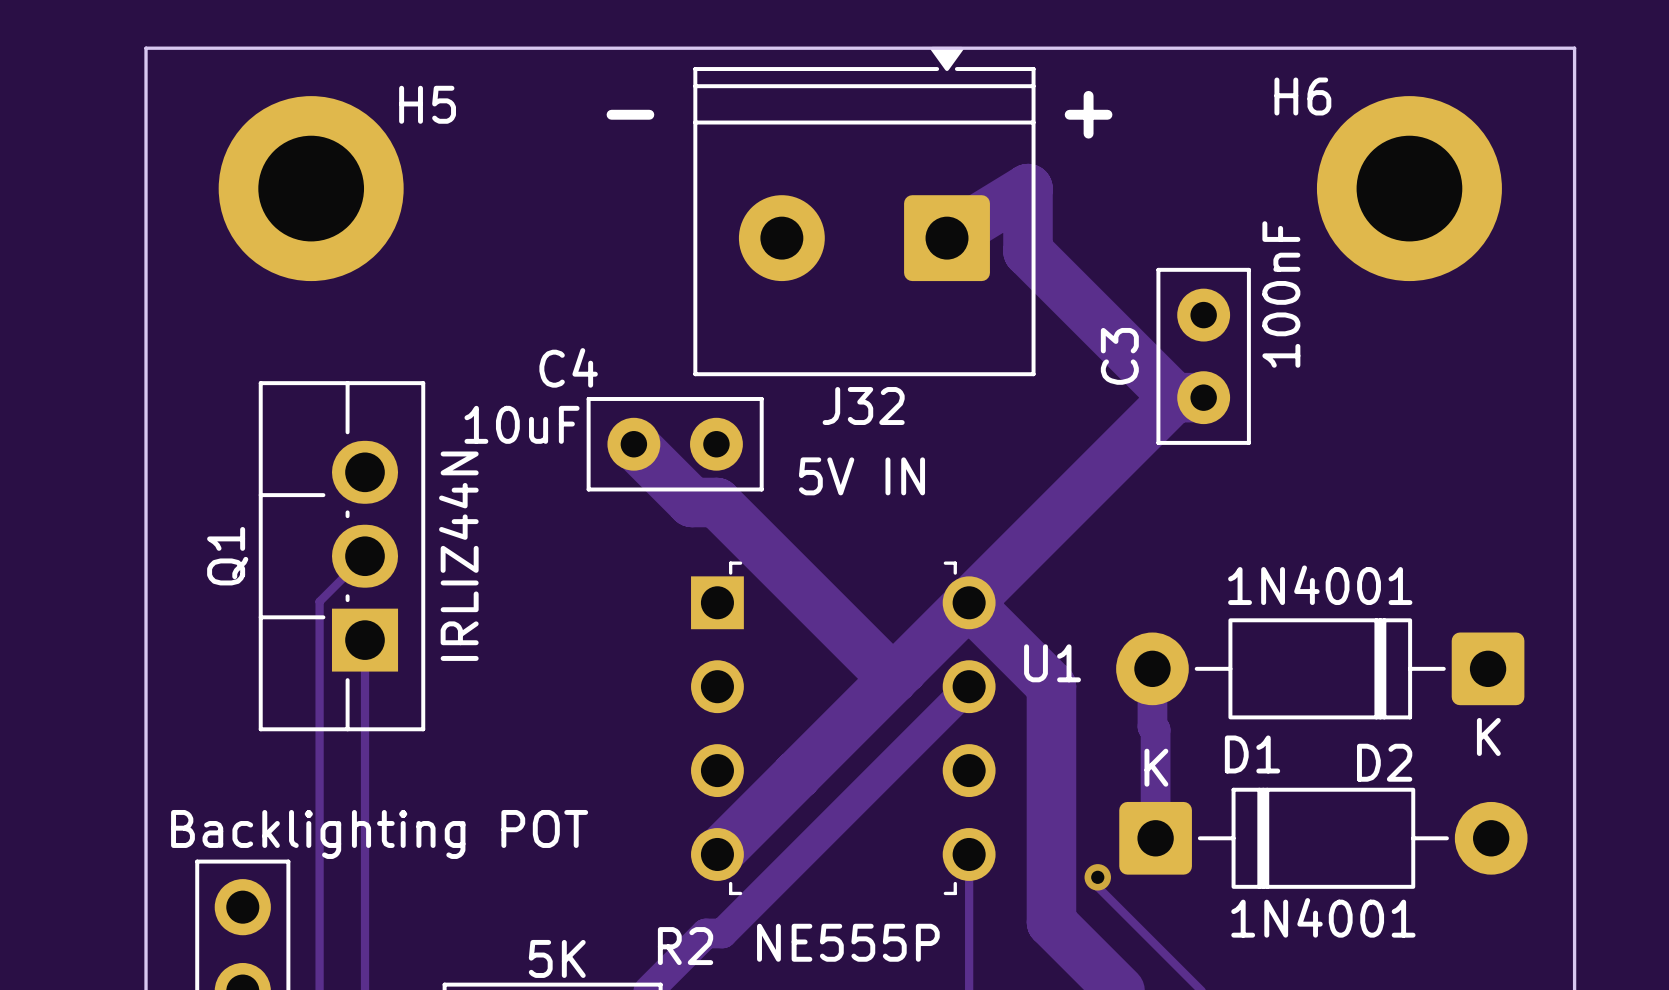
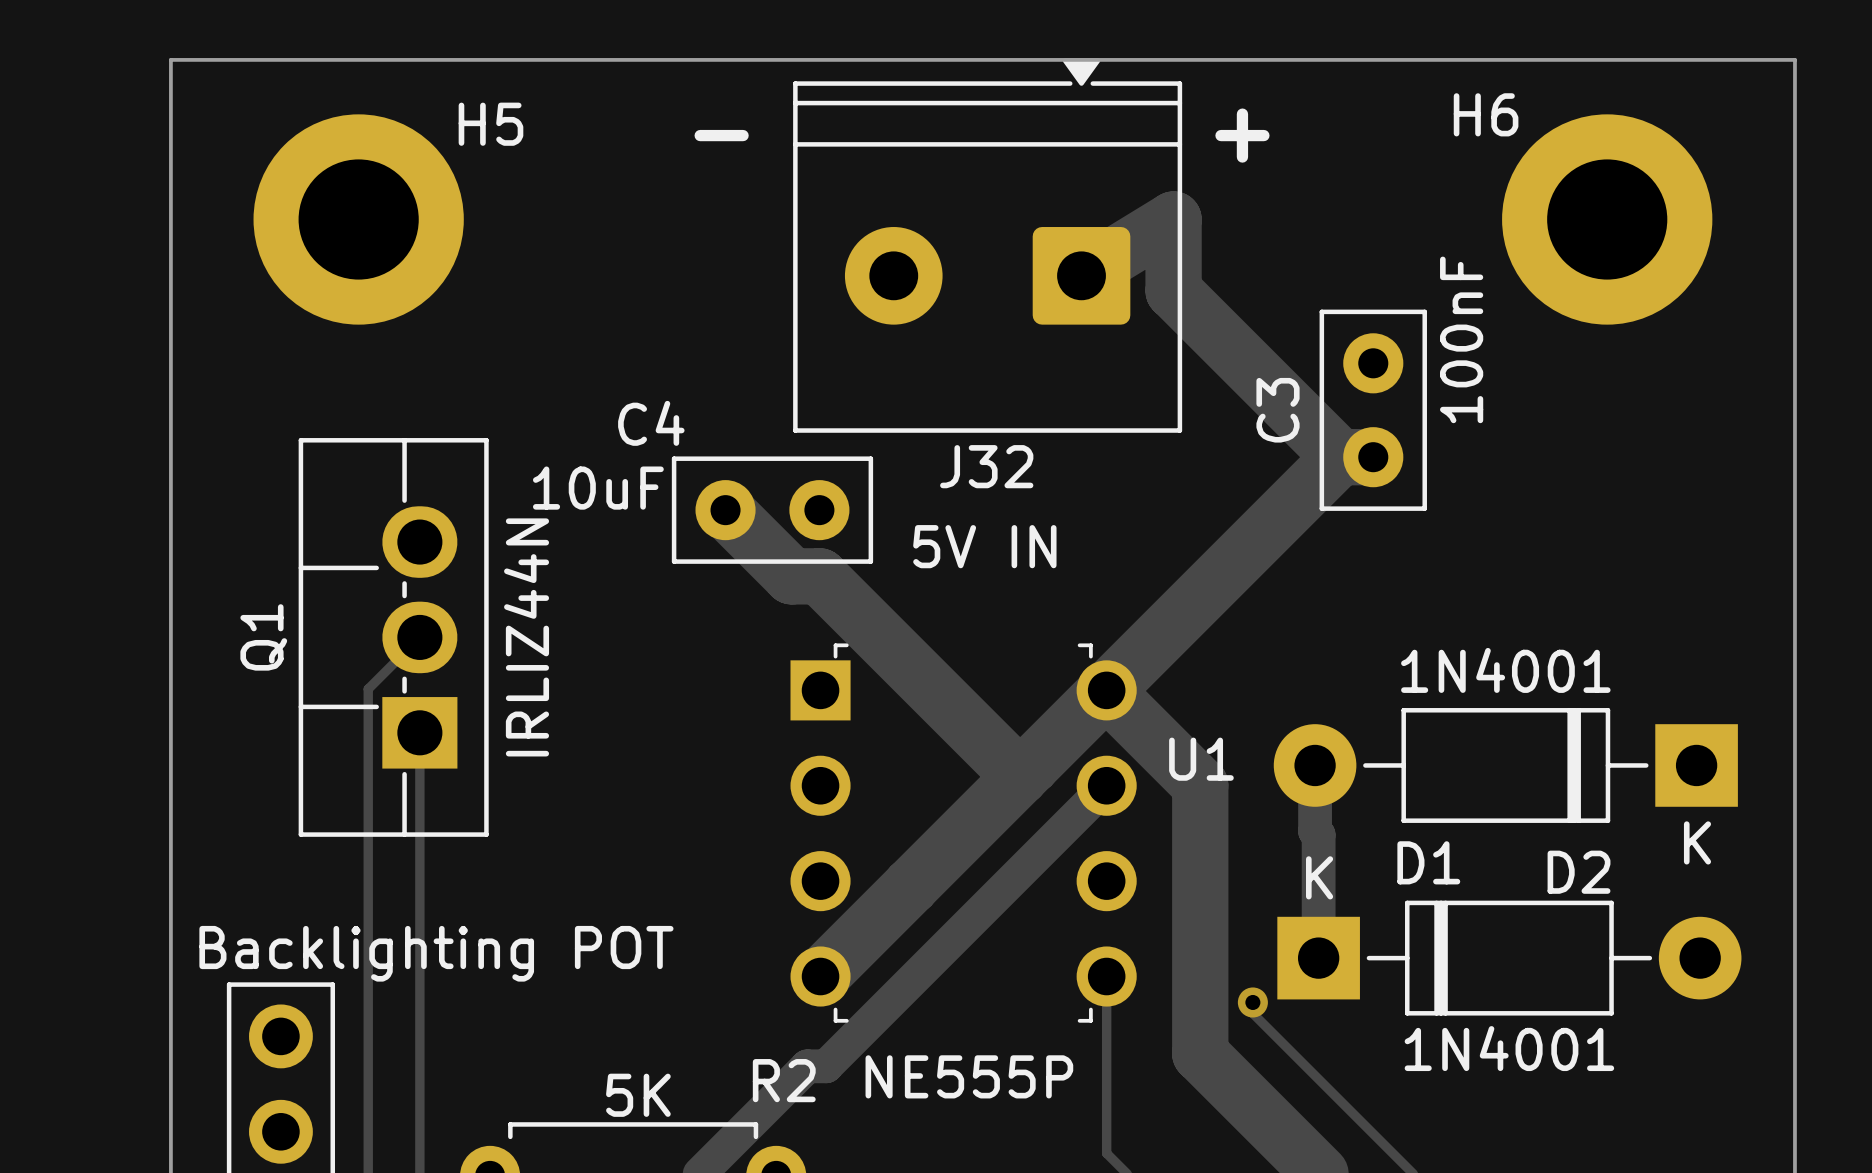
Q1 footprint: [258, 381, 426, 732] -> [298, 438, 489, 837]
D1 footprint: [1116, 618, 1525, 720] -> [1273, 708, 1738, 823]
D2 footprint: [1119, 787, 1528, 889] -> [1277, 900, 1742, 1016]

